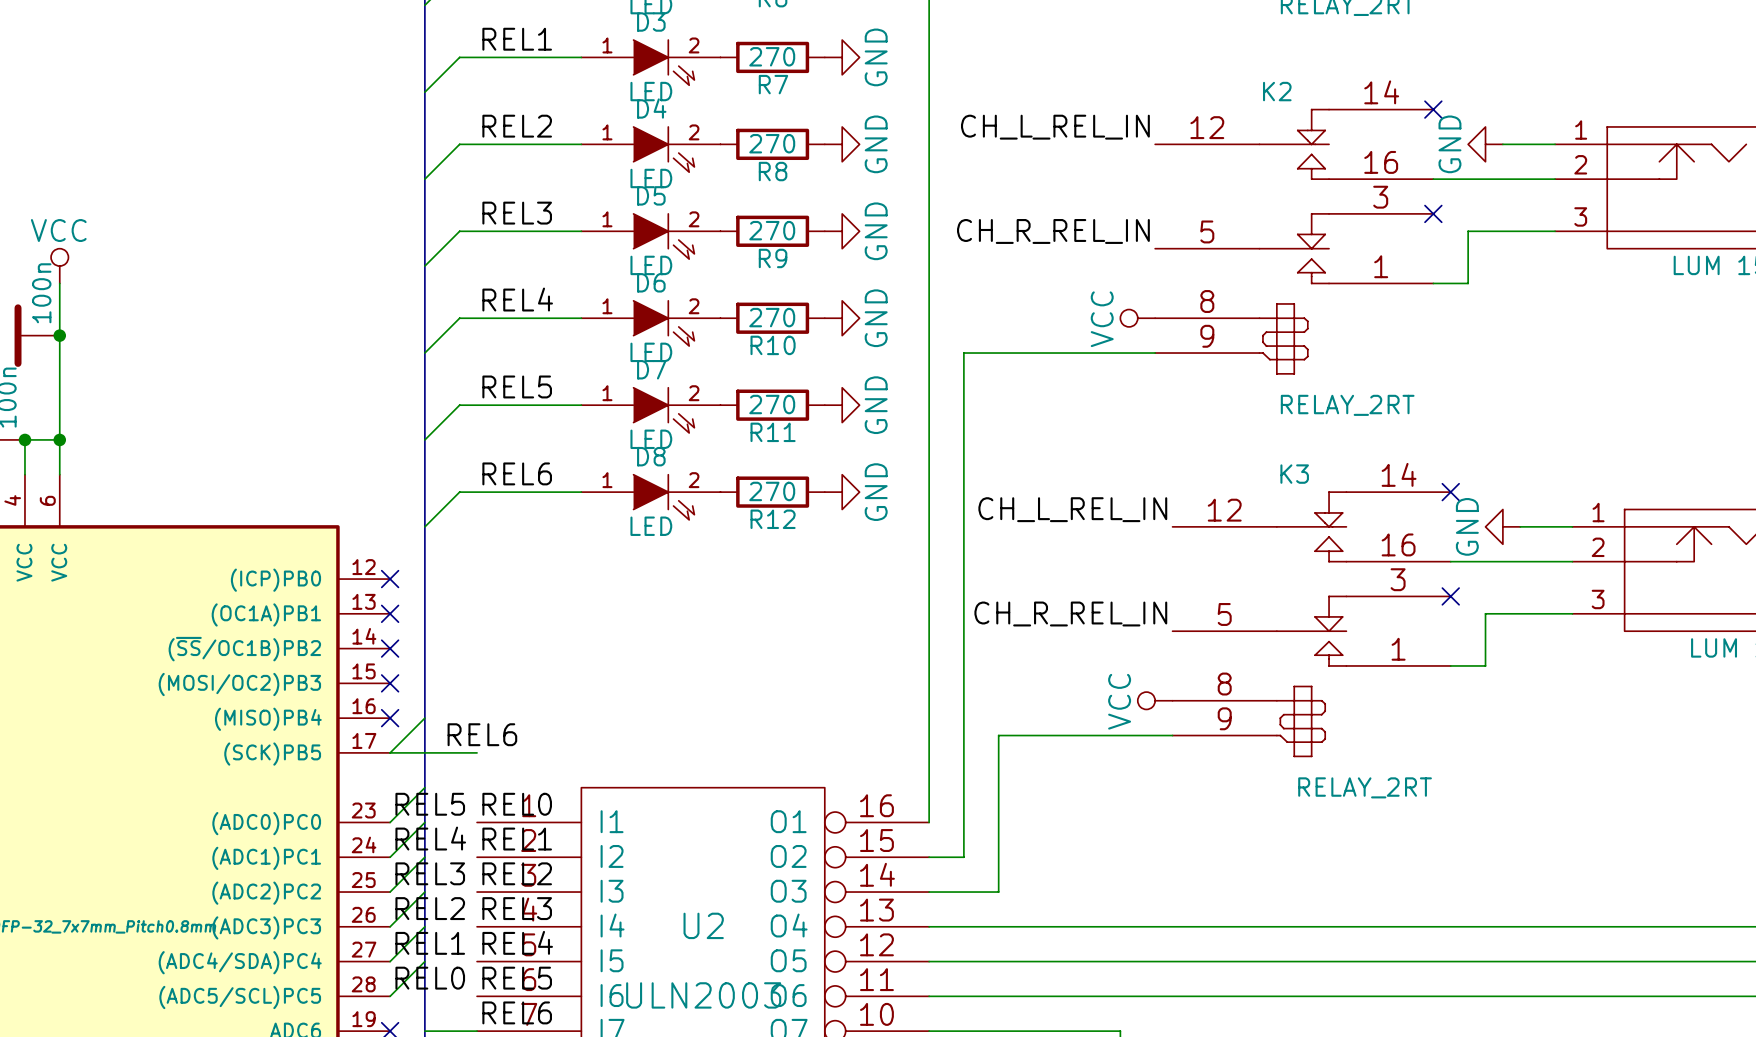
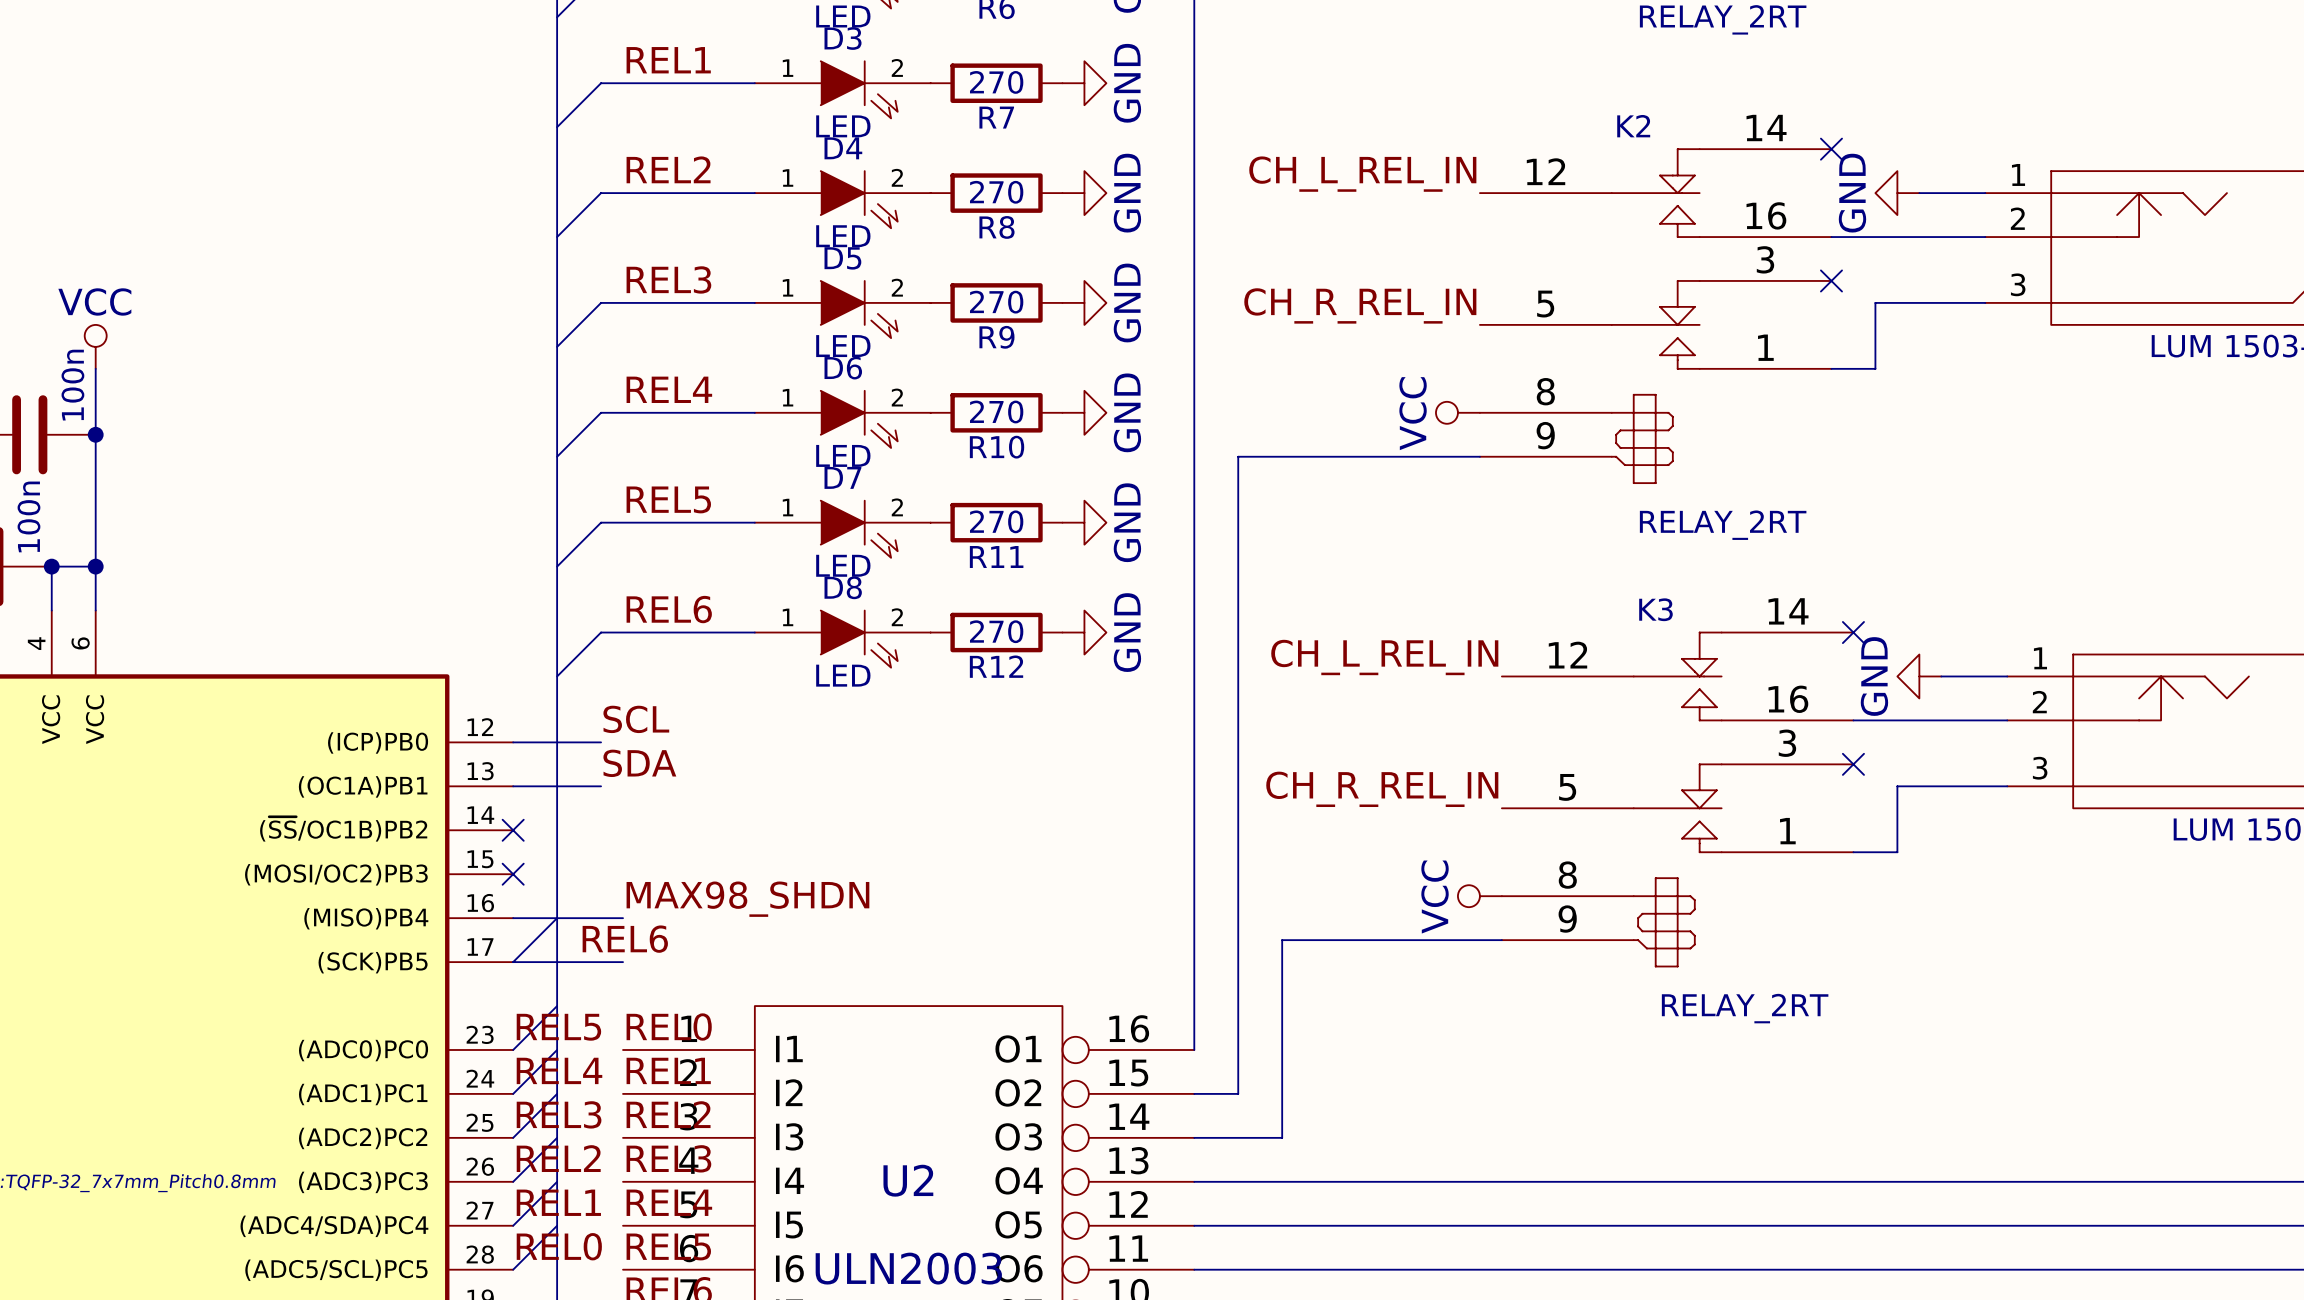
label: none -> SCL (636, 719)
wire: none -> (513, 742) (601, 742)
no-connect mark: (390, 579) -> none
label: none -> SDA (639, 763)
wire: none -> (513, 786) (601, 786)
no-connect mark: (390, 613) -> none
label: none -> MAX98_SHDN (747, 899)
wire: none -> (513, 918) (623, 918)
no-connect mark: (390, 718) -> none

